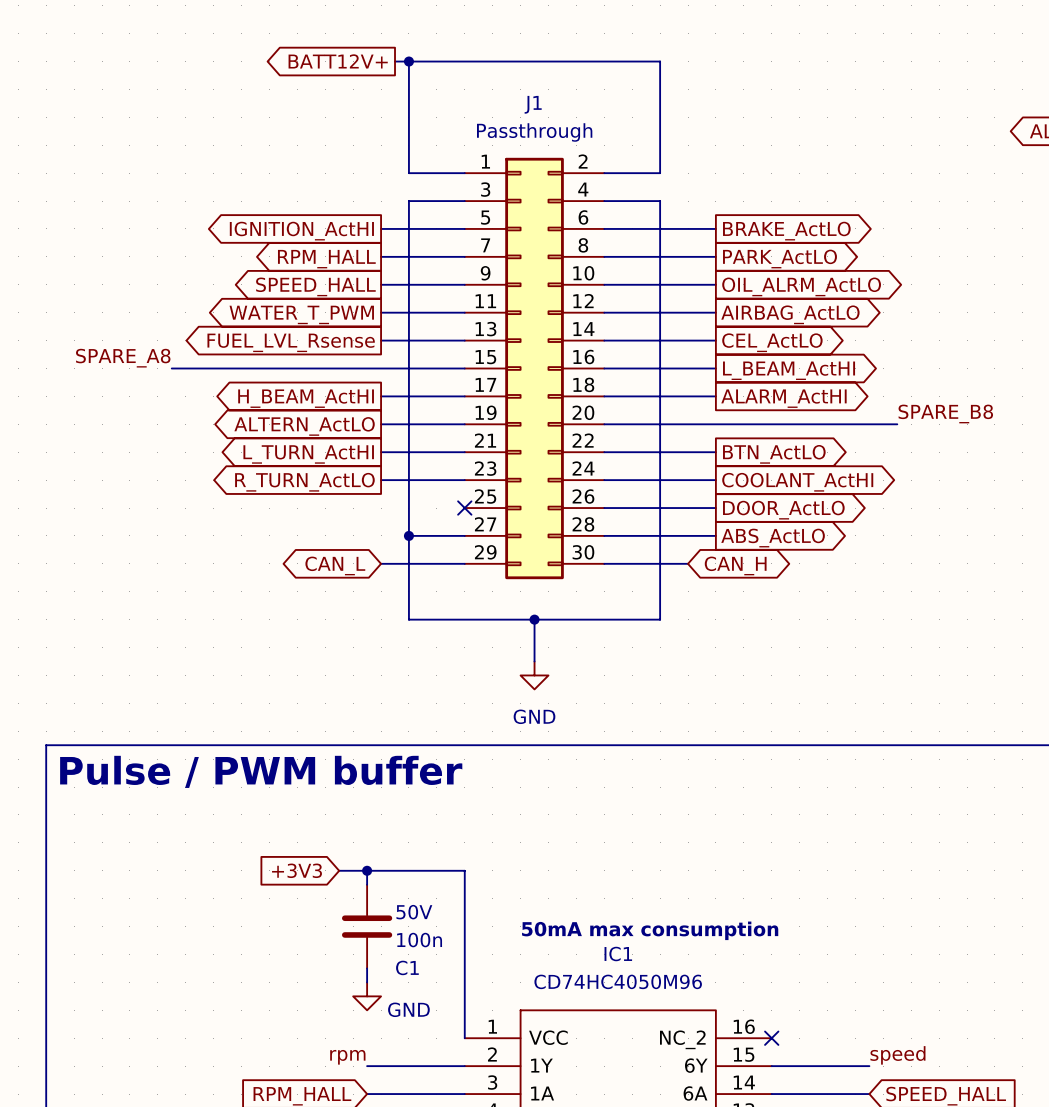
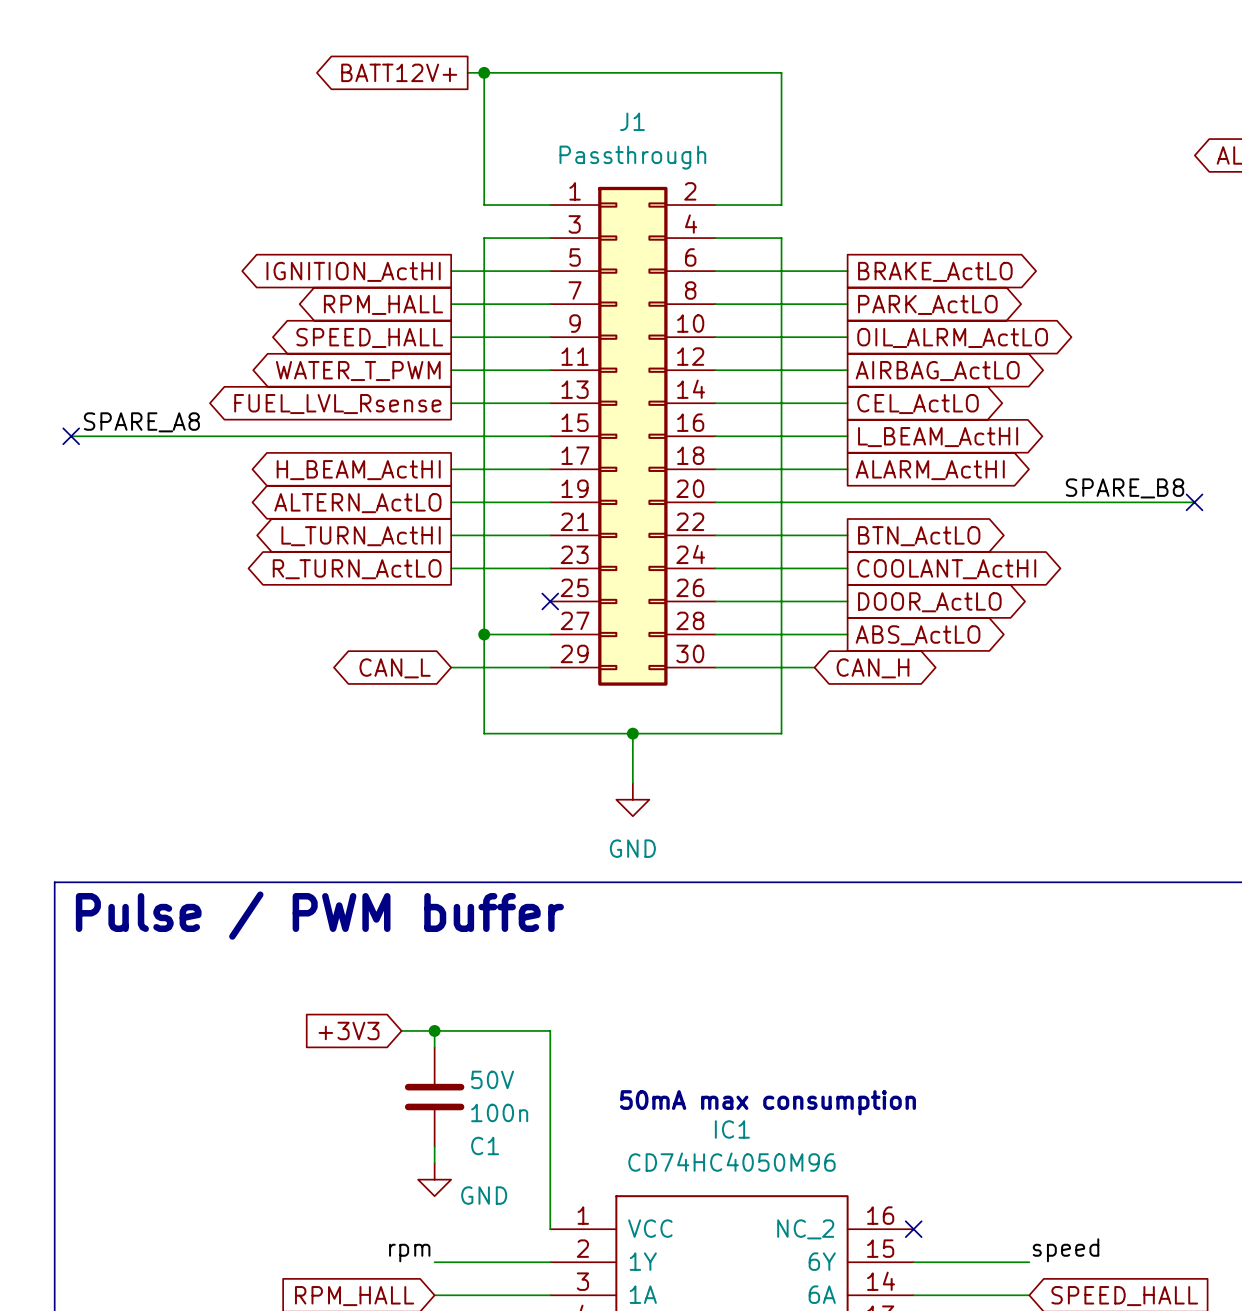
wire: none -> (71, 436) (203, 436)
no-connect mark: none -> (71, 436)
wire: none -> (1062, 502) (1194, 502)
no-connect mark: none -> (1194, 502)

